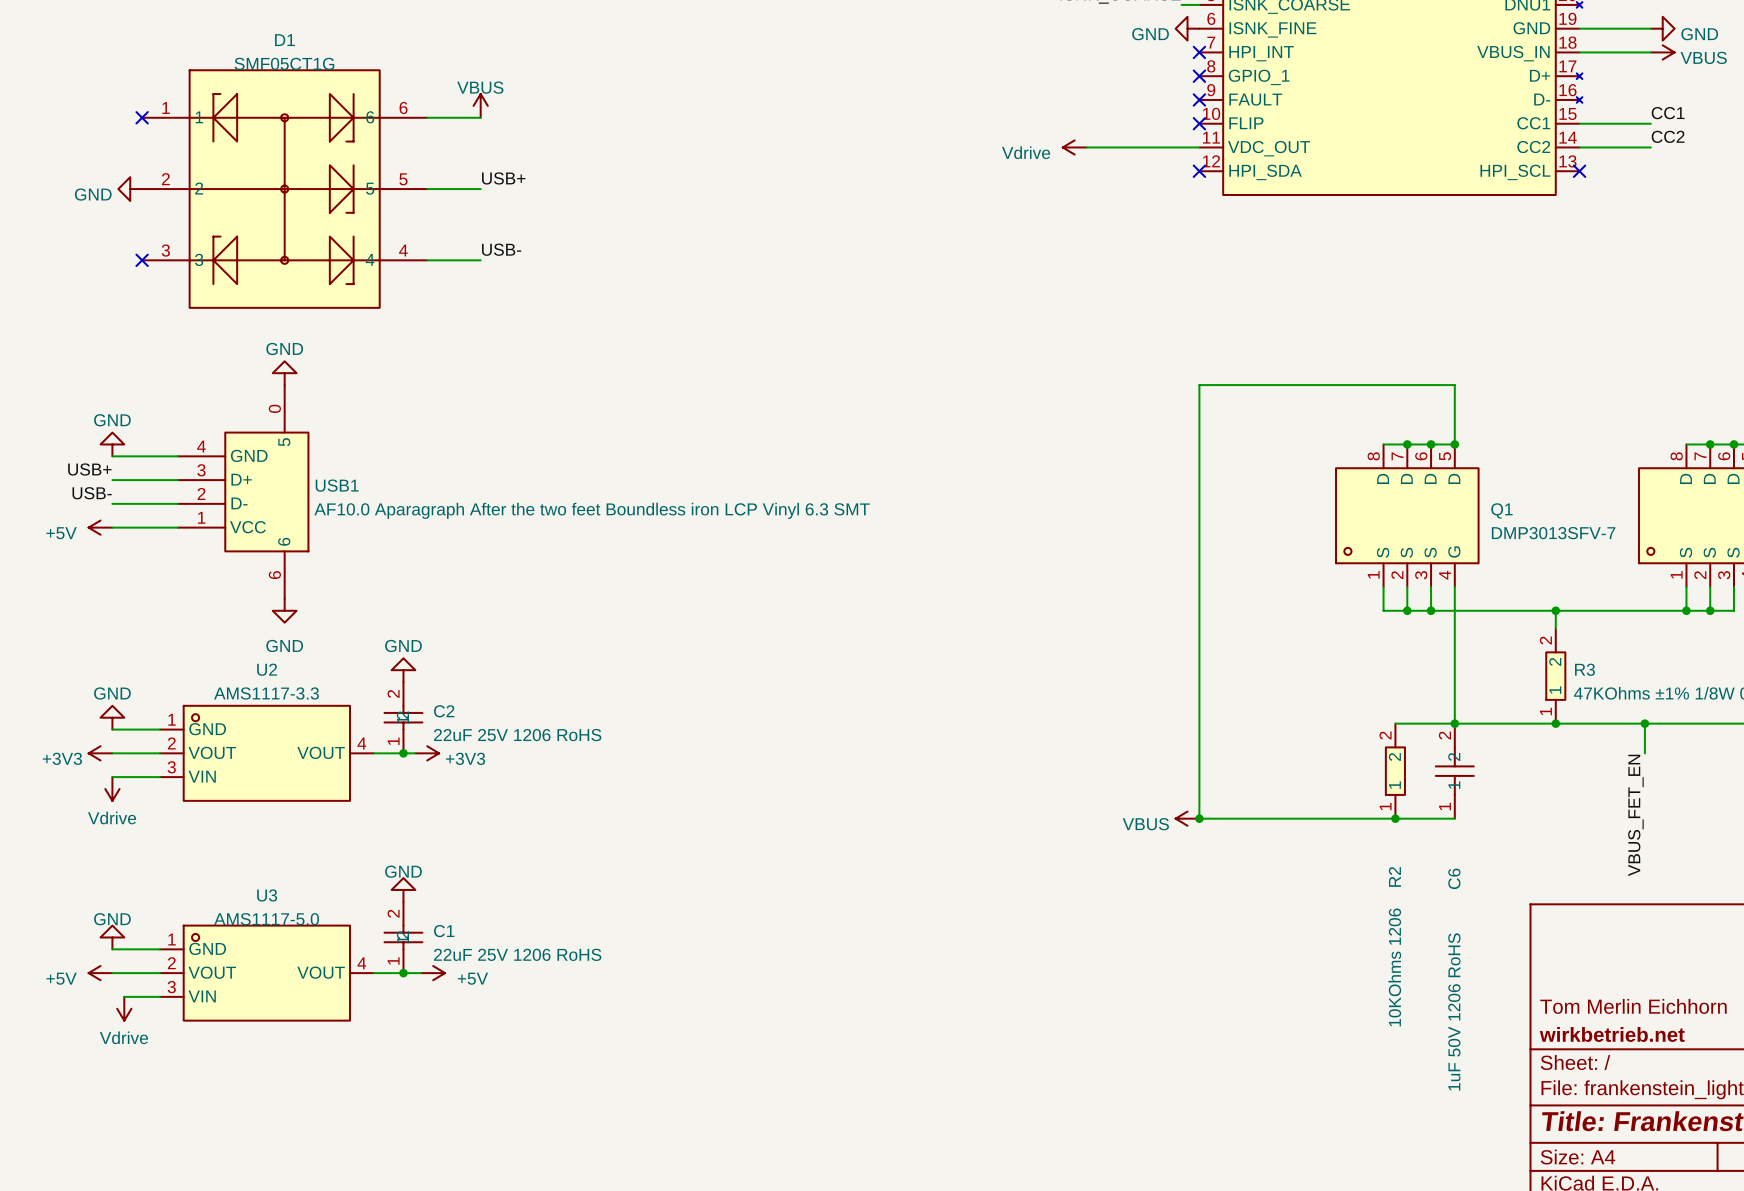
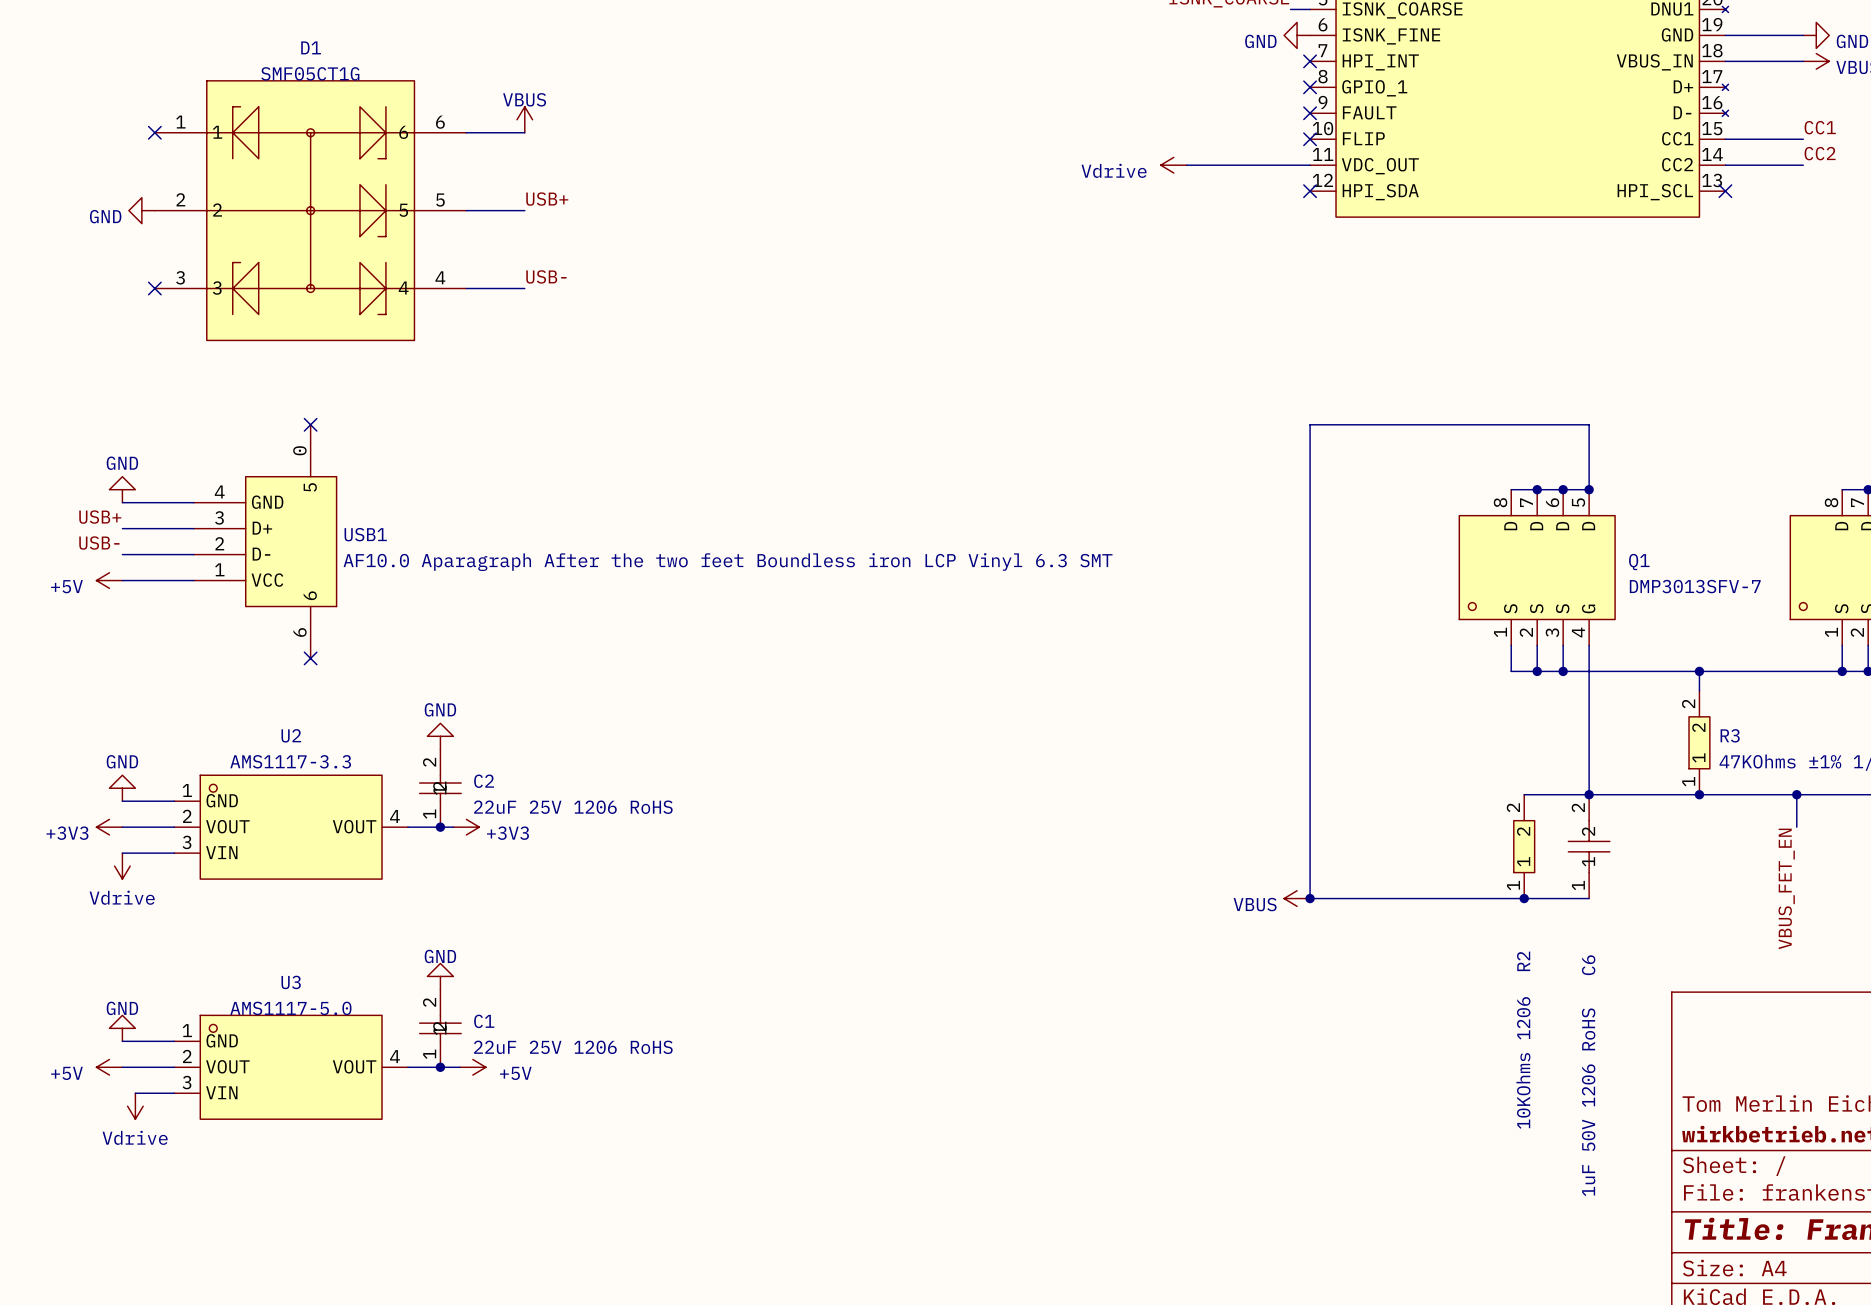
power symbol: GND (284, 373) -> none
no-connect mark: none -> (310, 424)
no-connect mark: none -> (310, 658)
power symbol: GND (284, 610) -> none

